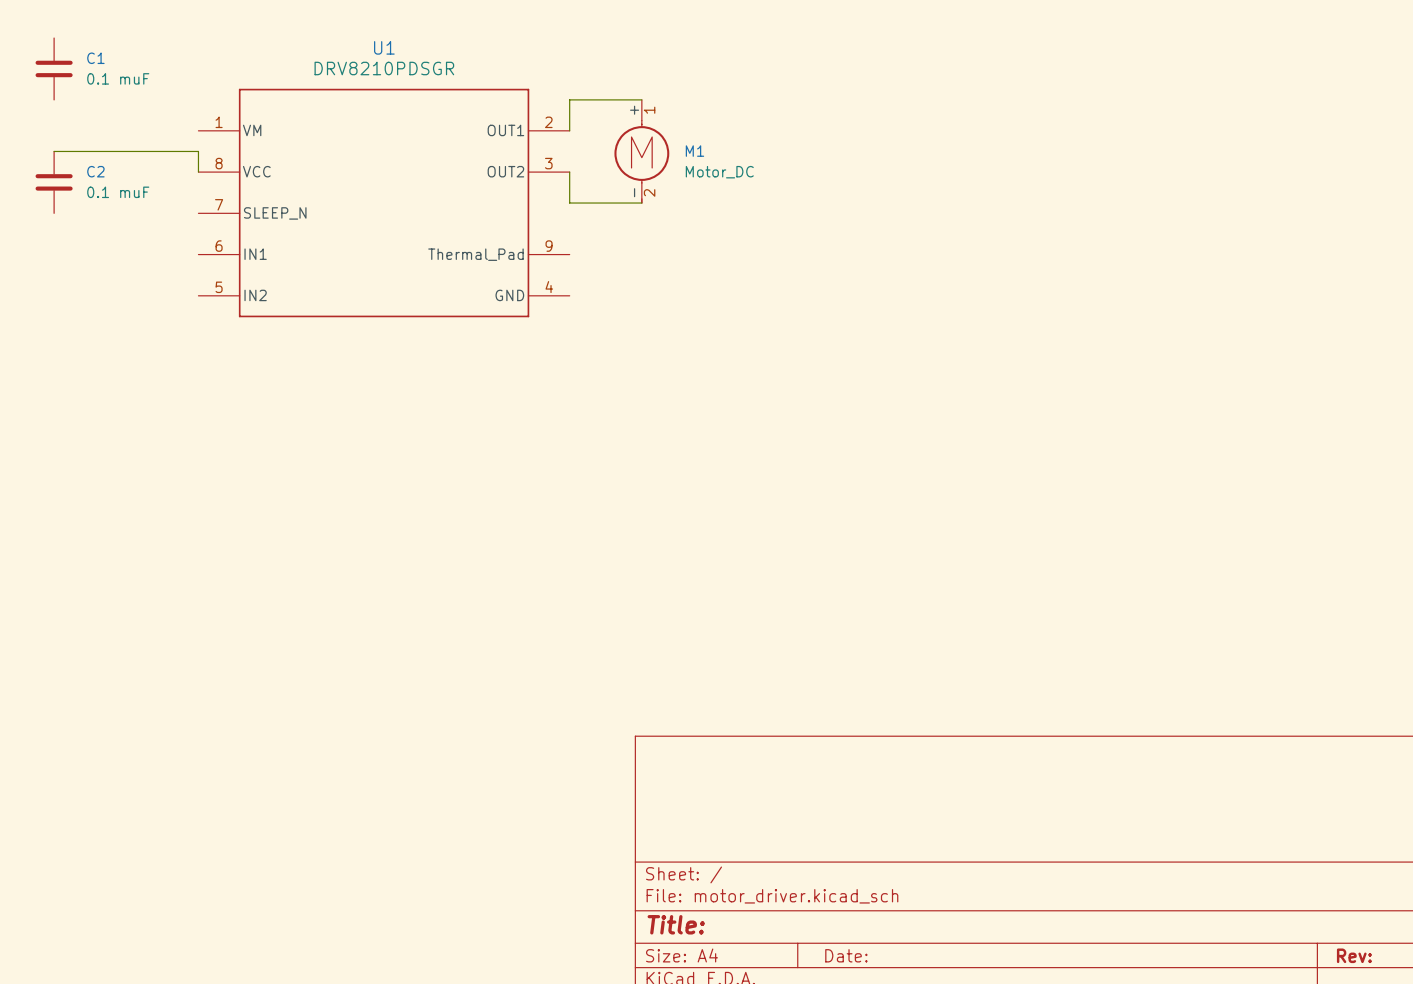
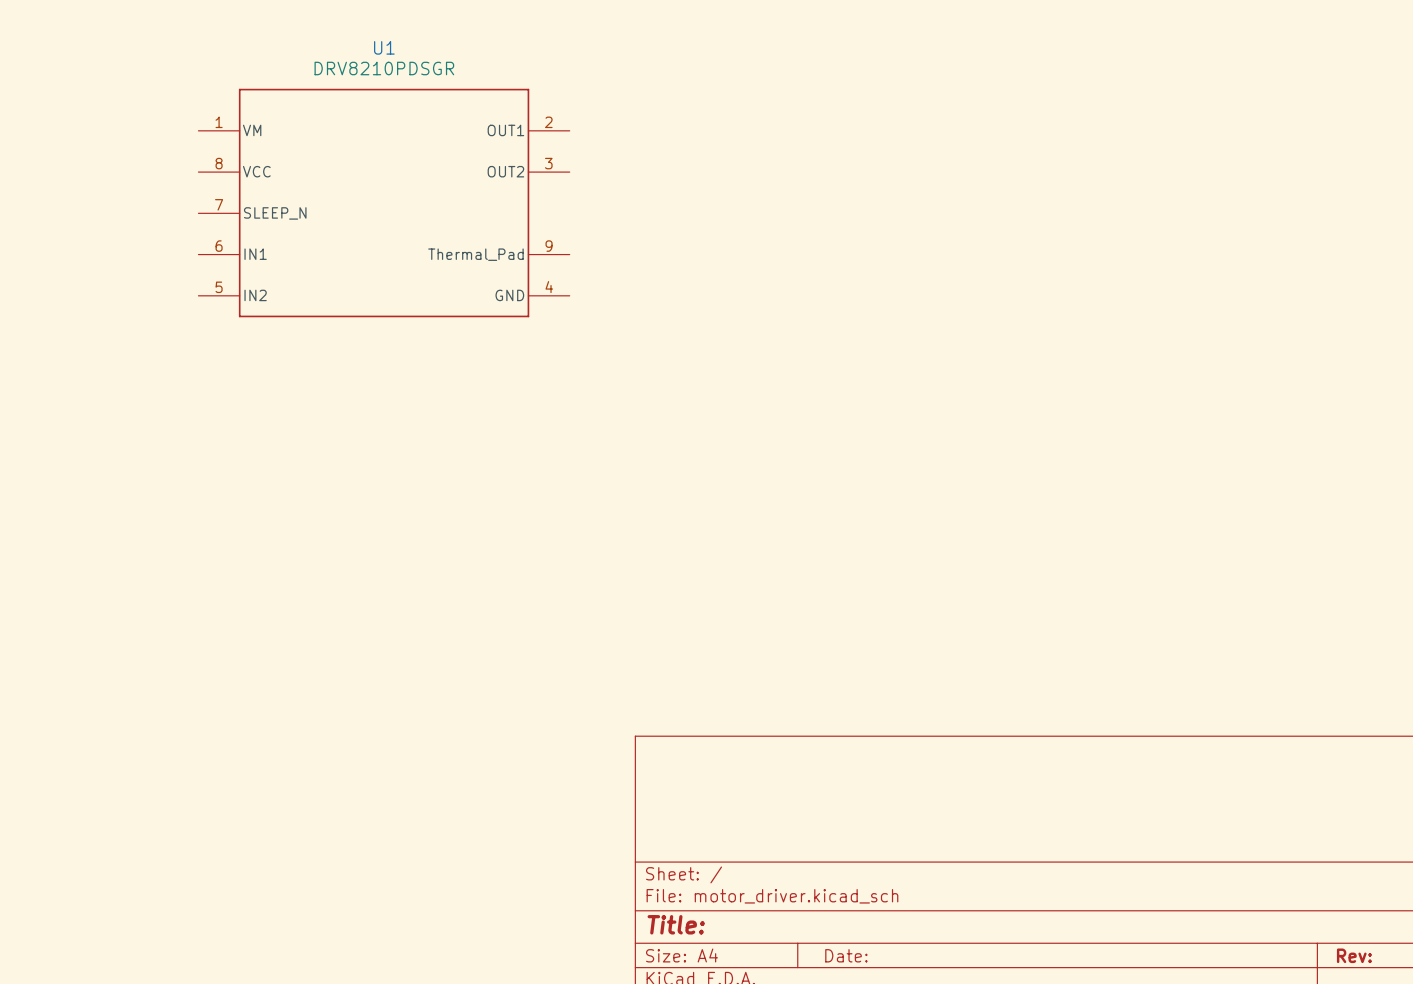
C1: 0.1 muF (54, 68) -> none
wire: (641, 99) (569, 99) (569, 130) -> none
wire: (54, 151) (198, 151) (198, 172) -> none
M1: Motor_DC (641, 151) -> none
wire: (569, 172) (569, 203) (641, 203) -> none
C2: 0.1 muF (54, 182) -> none

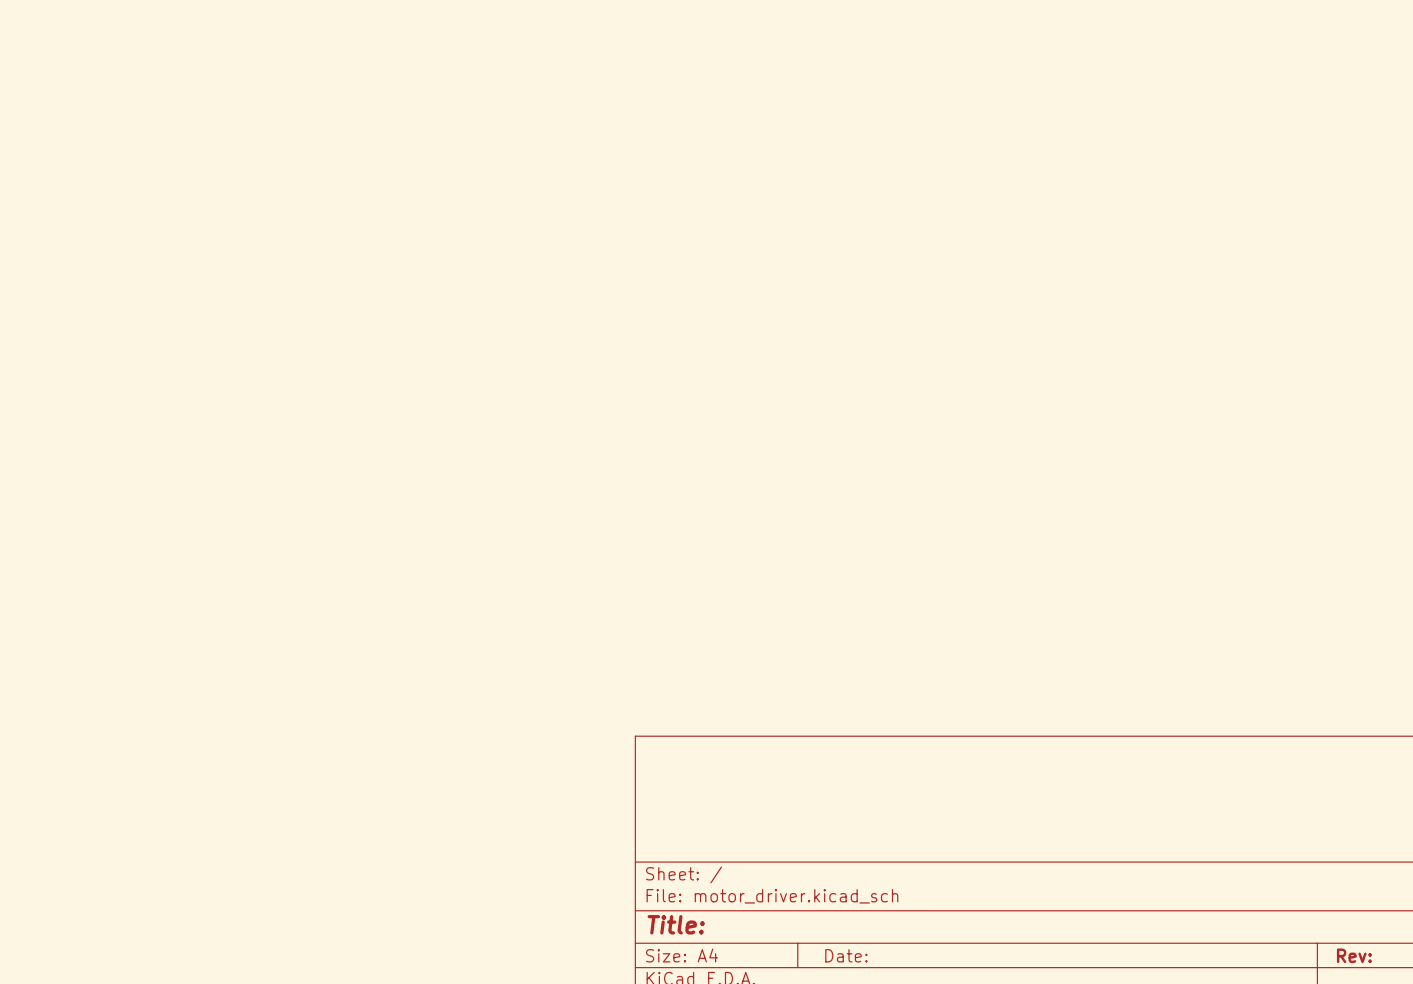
U1: DRV8210PDSGR (384, 203) -> none

